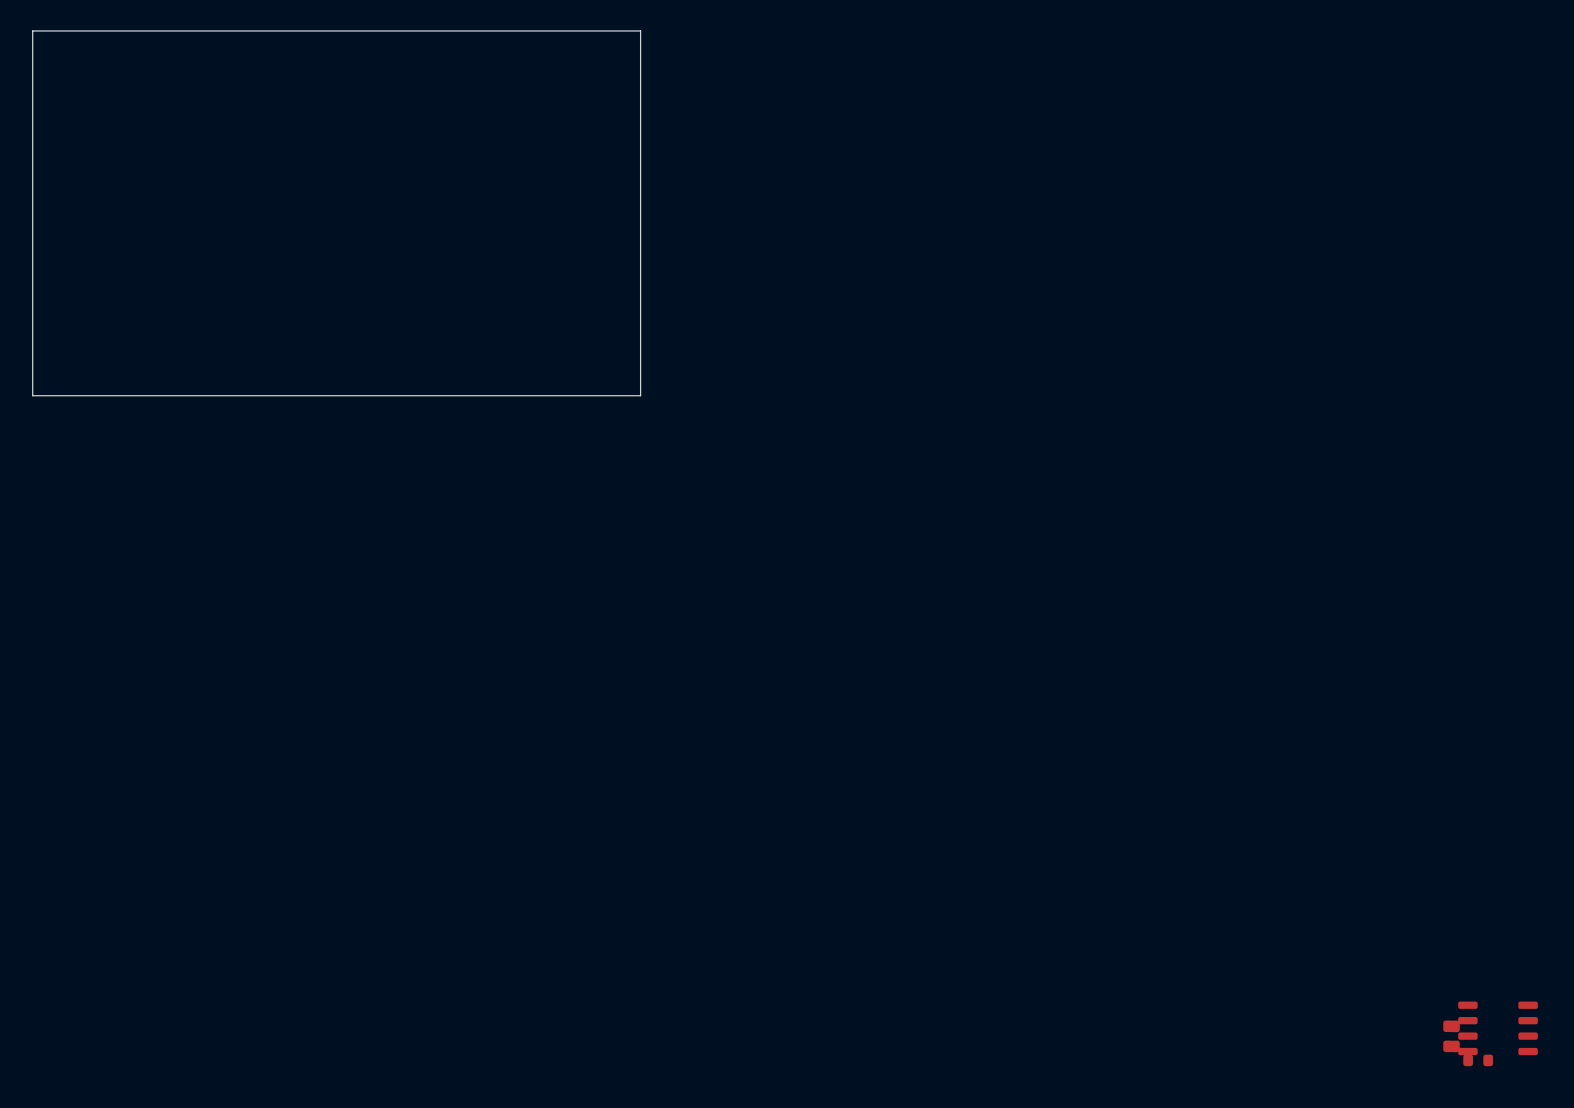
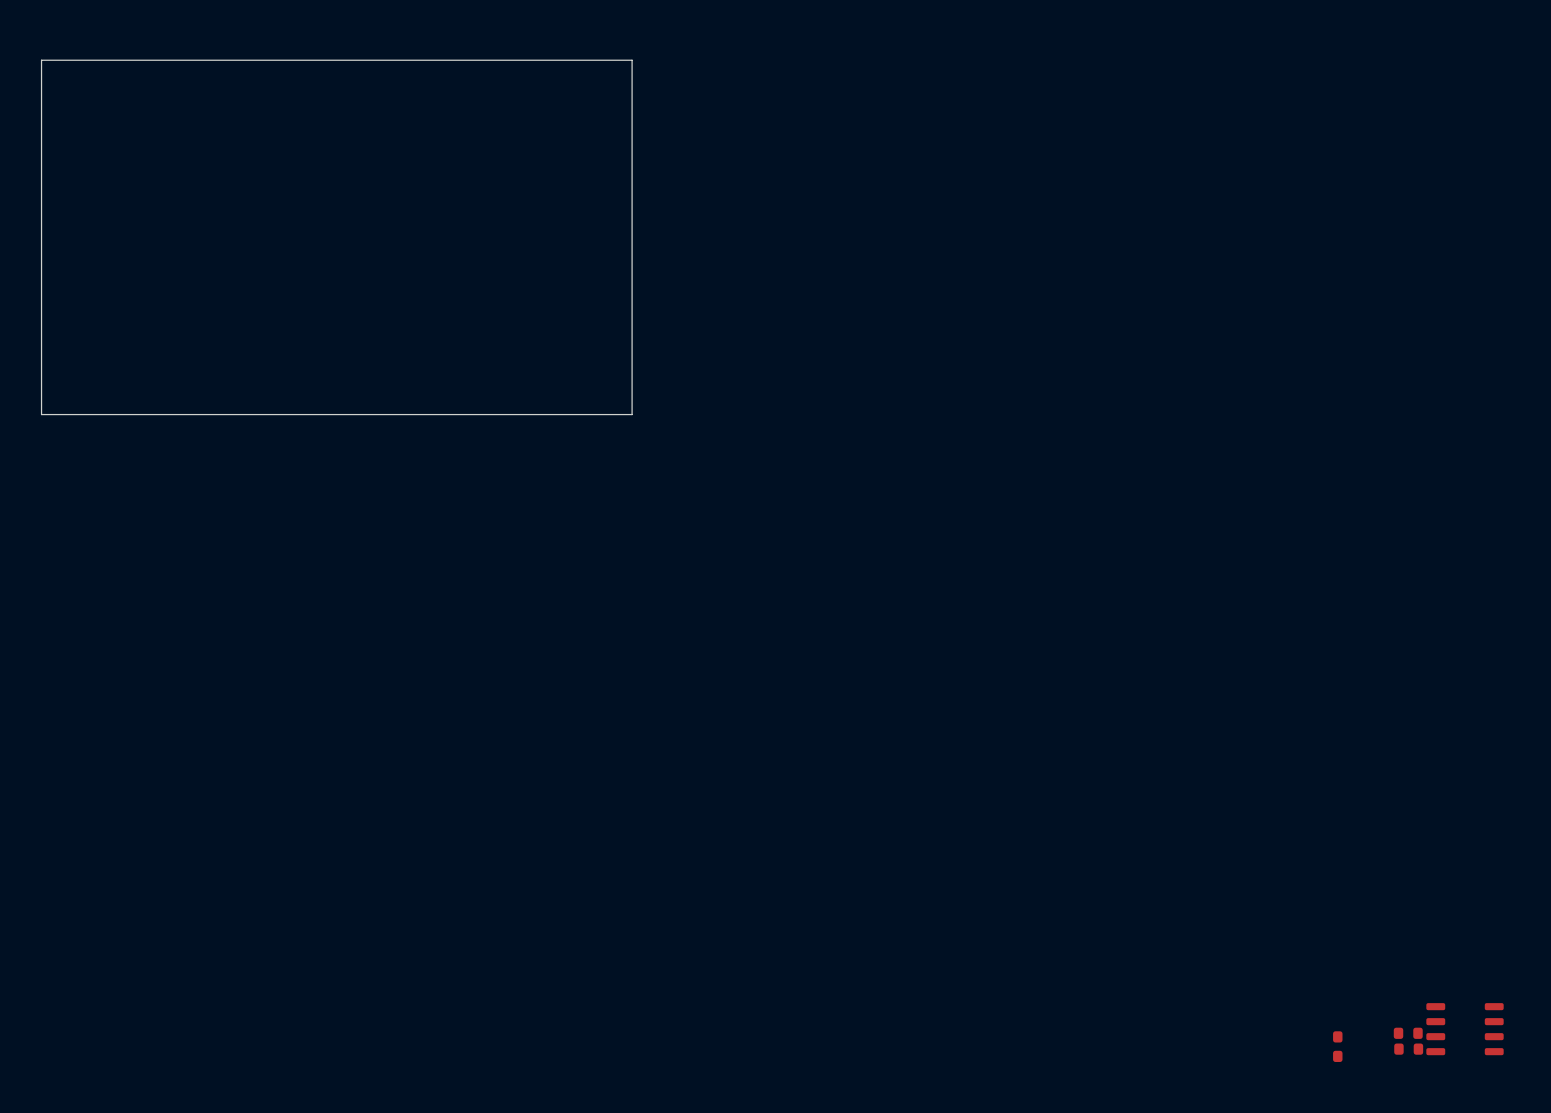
part: none -> (1408, 1033)
part: (1448, 1036) -> none
part: (1454, 1036) -> none
part: none -> (1337, 1046)
part: none -> (1408, 1049)
part: (1478, 1060) -> none

